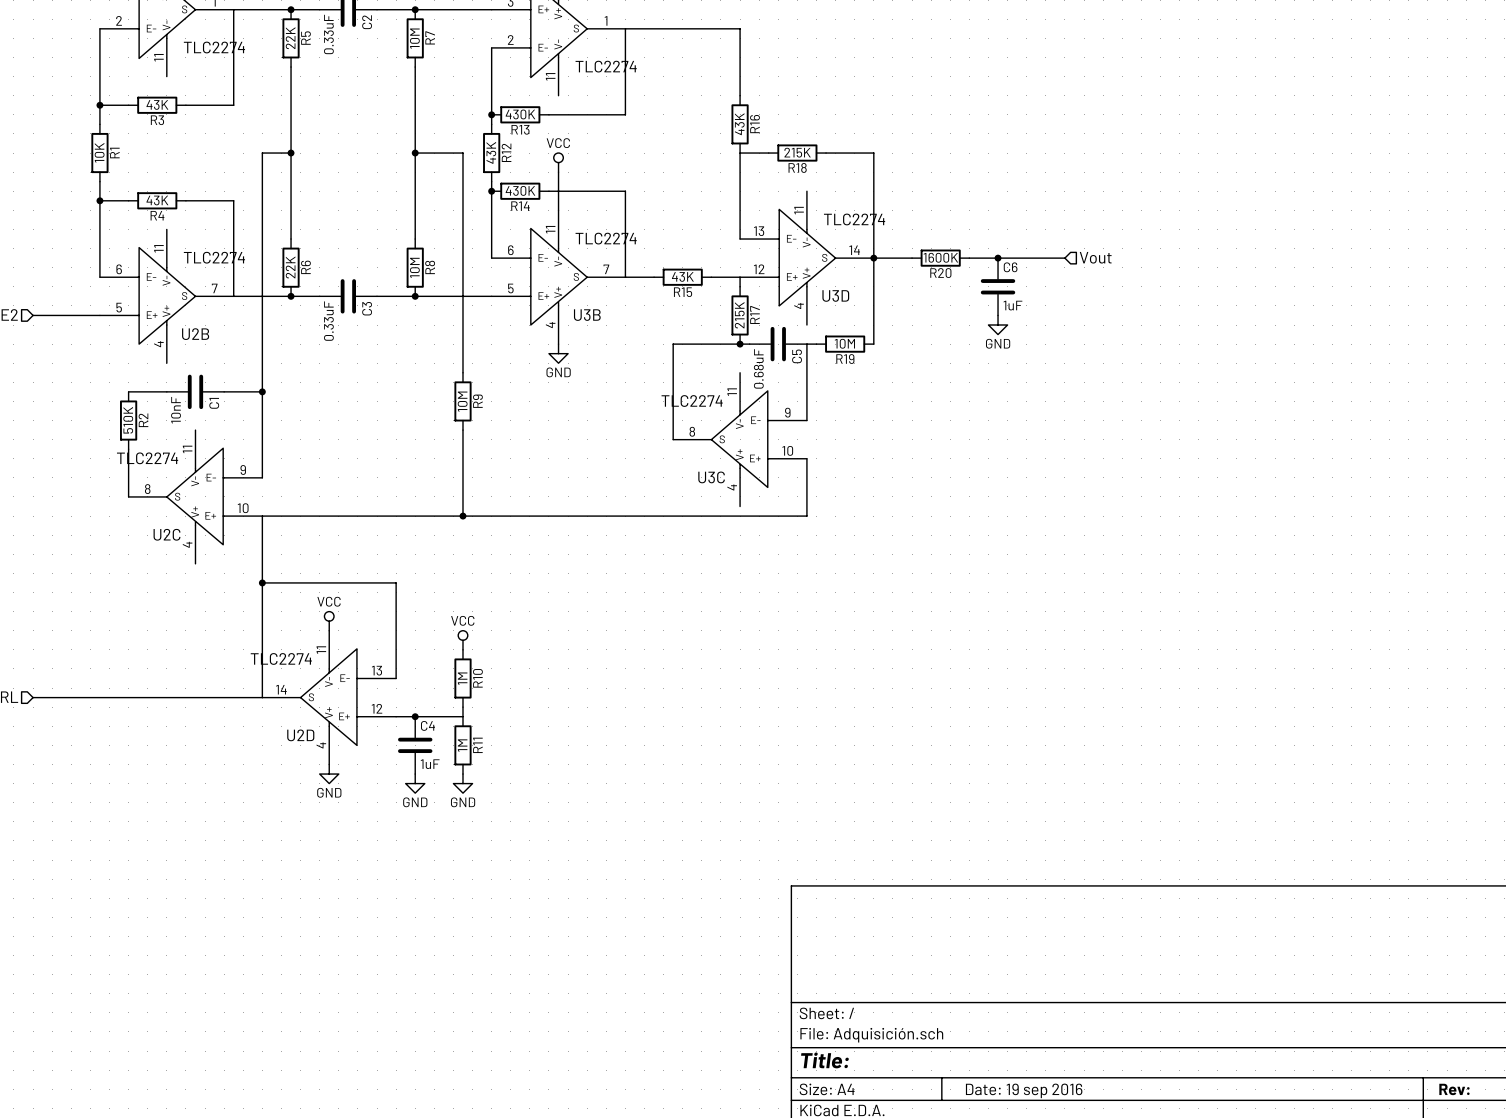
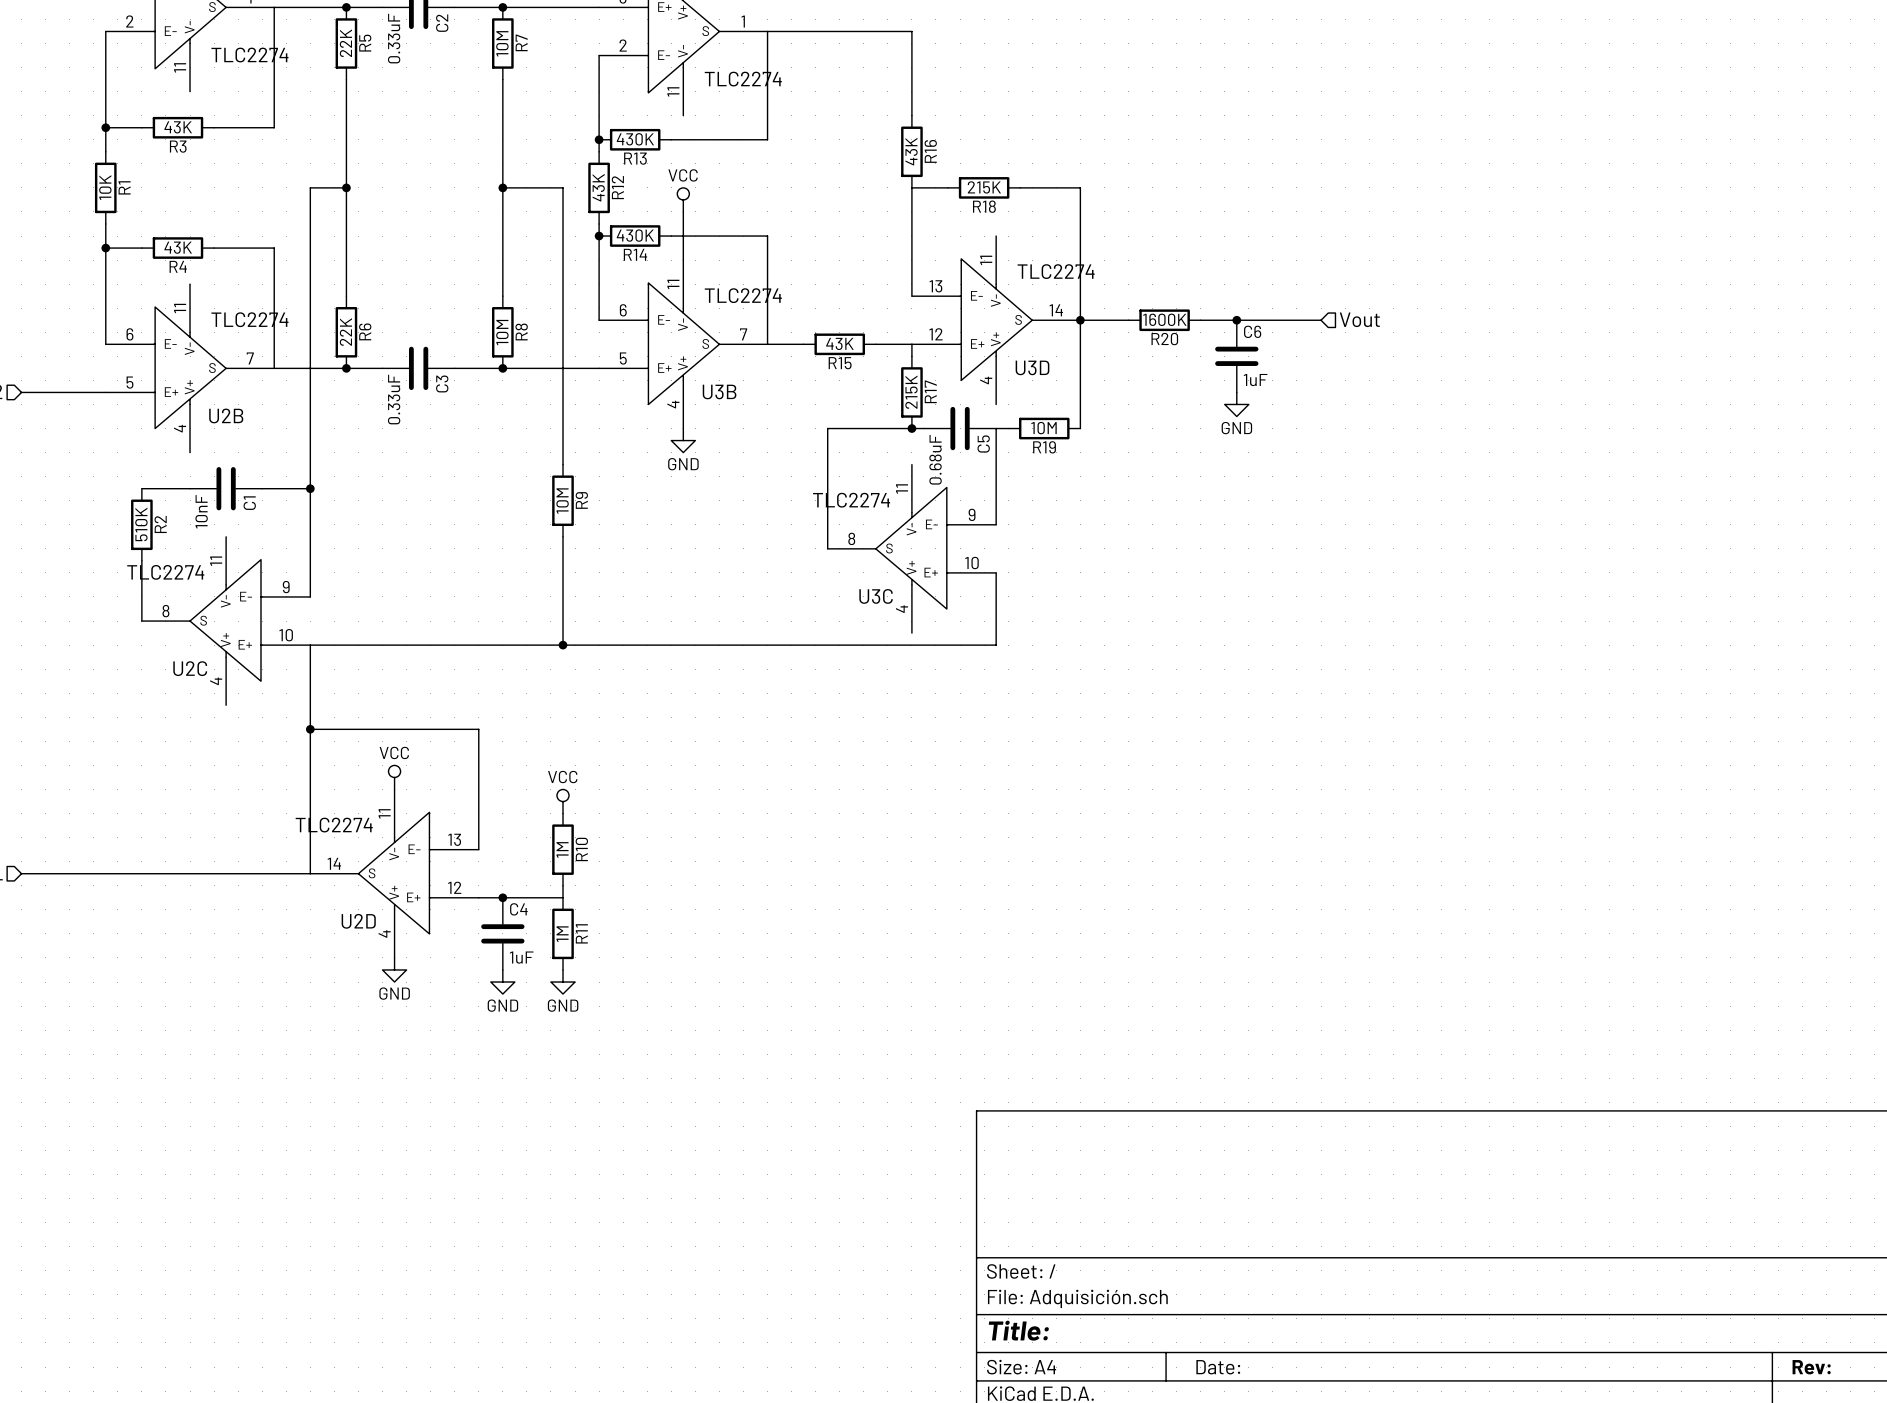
title block: Date: 19 sep 2016 (1024, 1090) -> Date: (1218, 1367)

